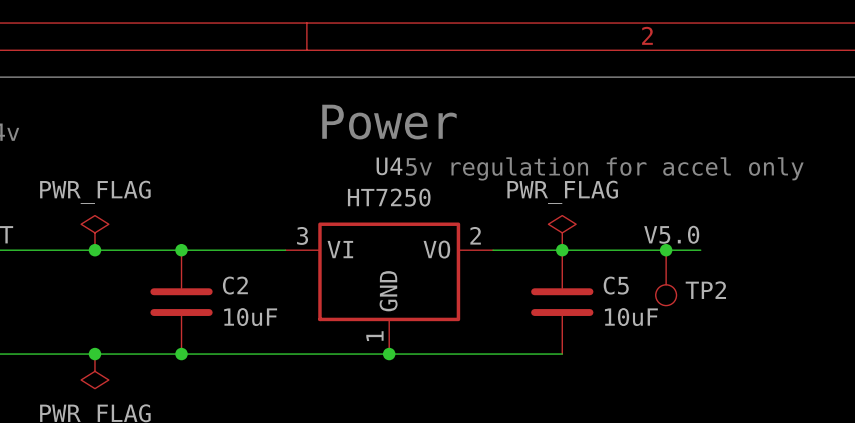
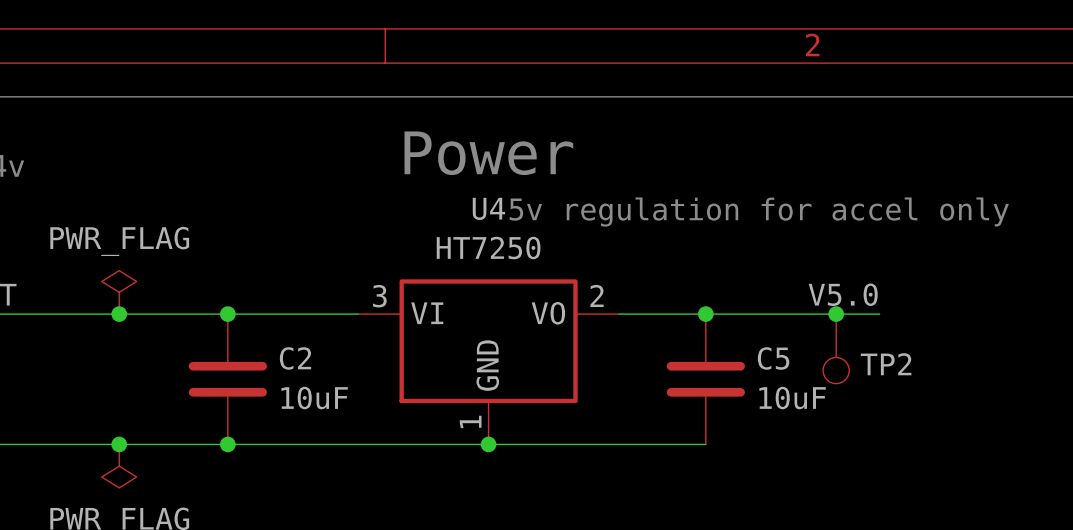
power symbol: PWR_FLAG (562, 232) -> none

